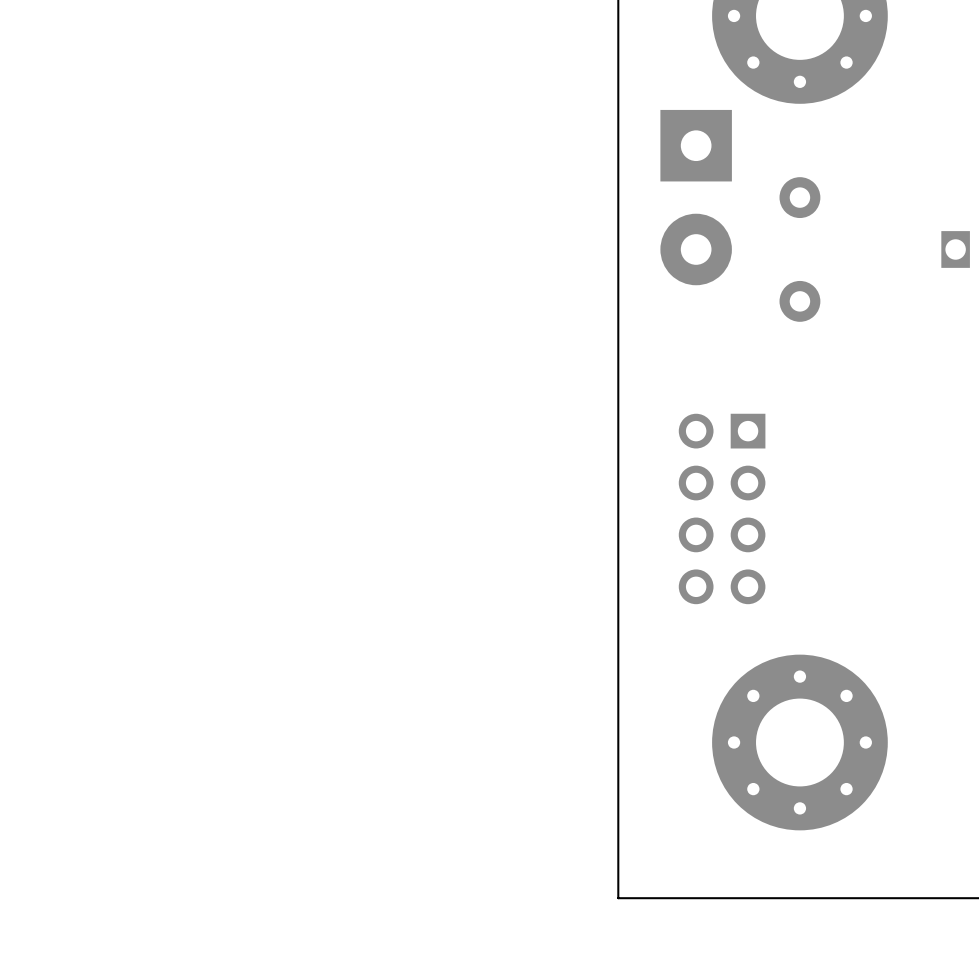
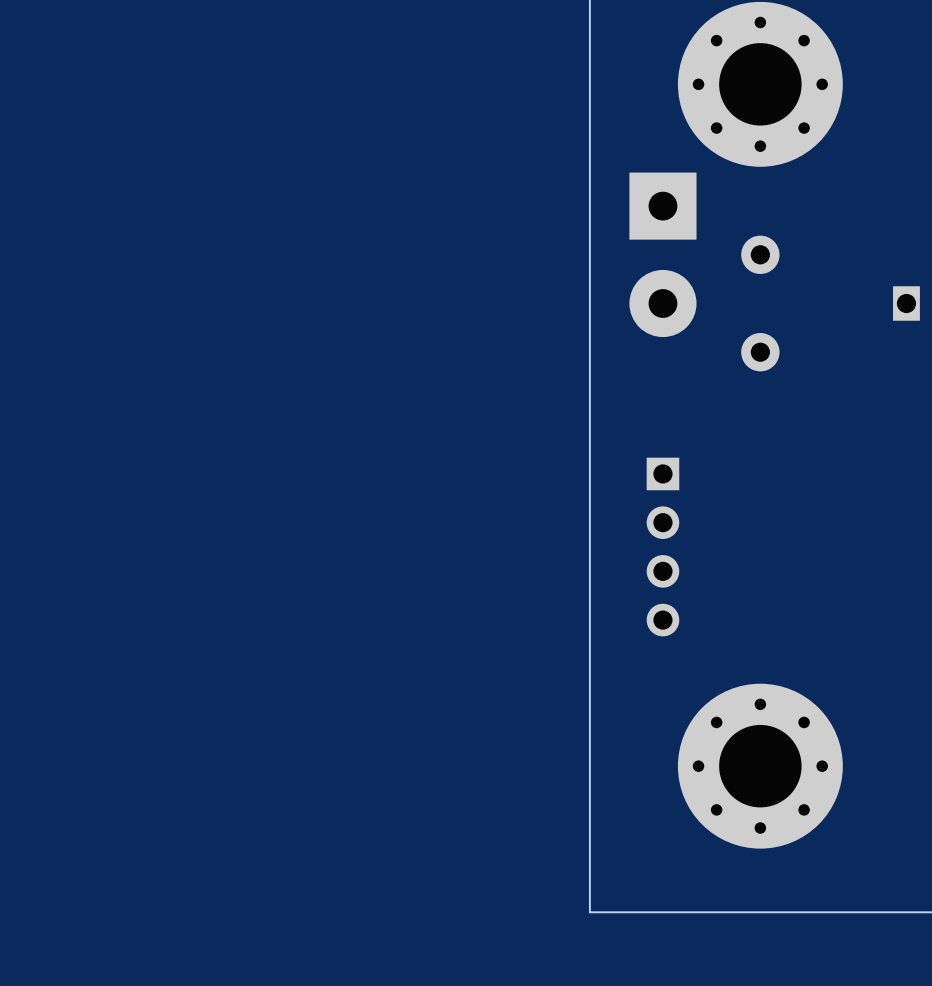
part: none -> (662, 547)
part: (722, 508) -> none

